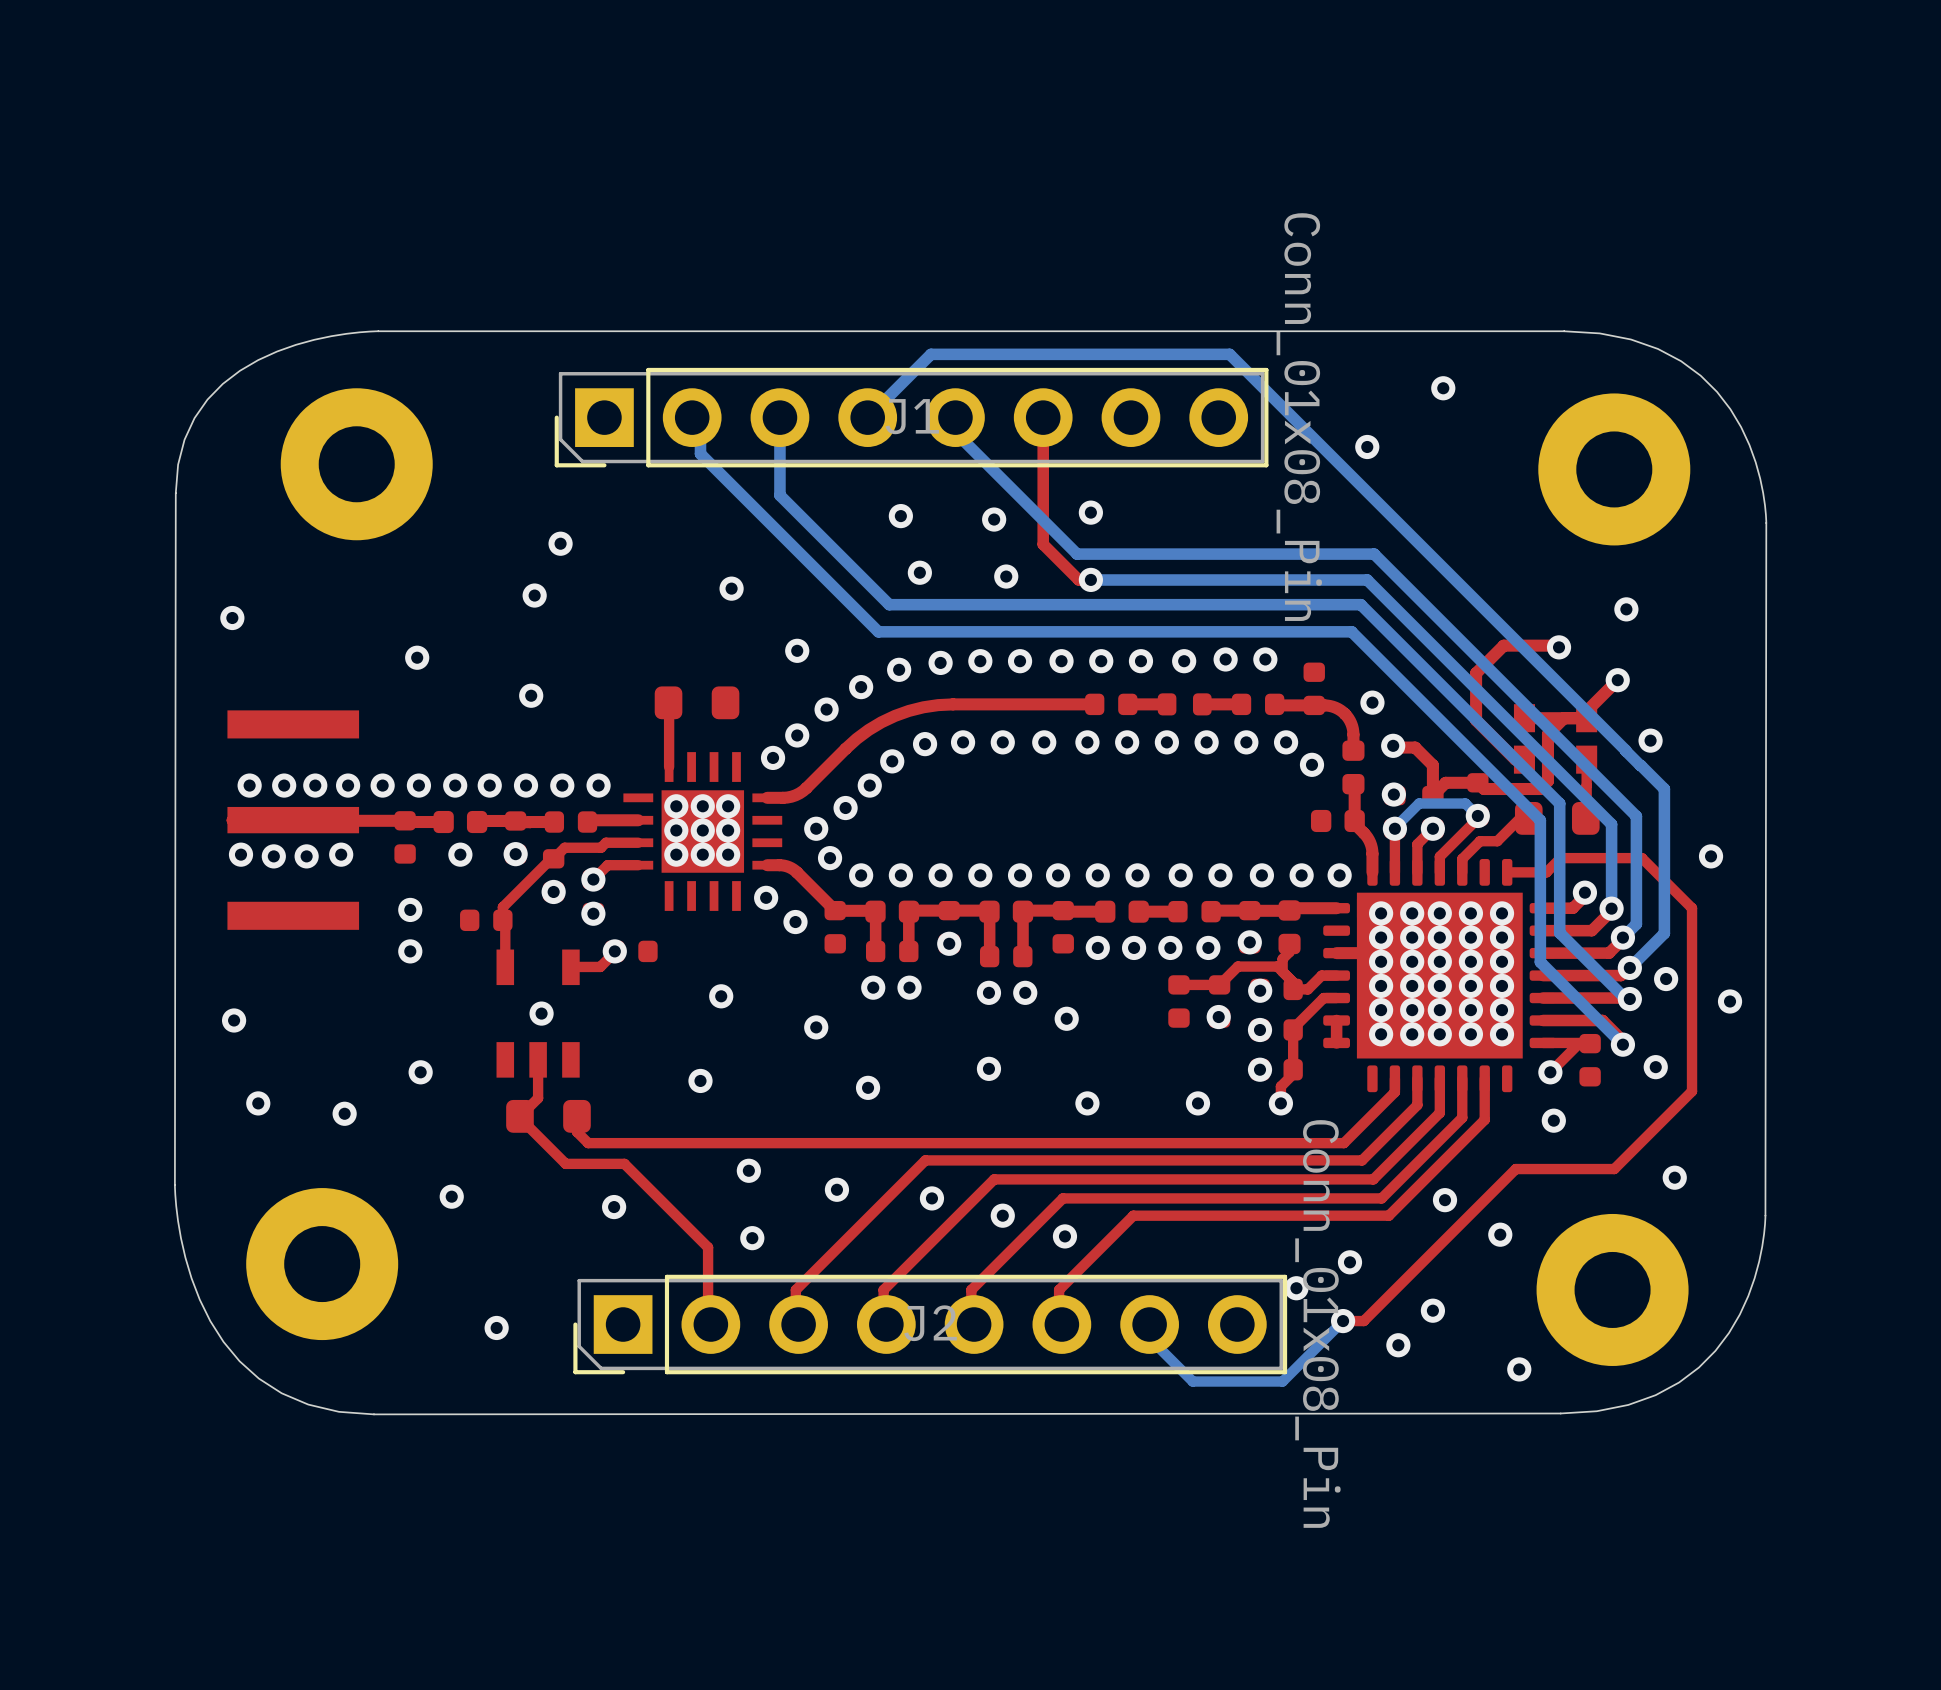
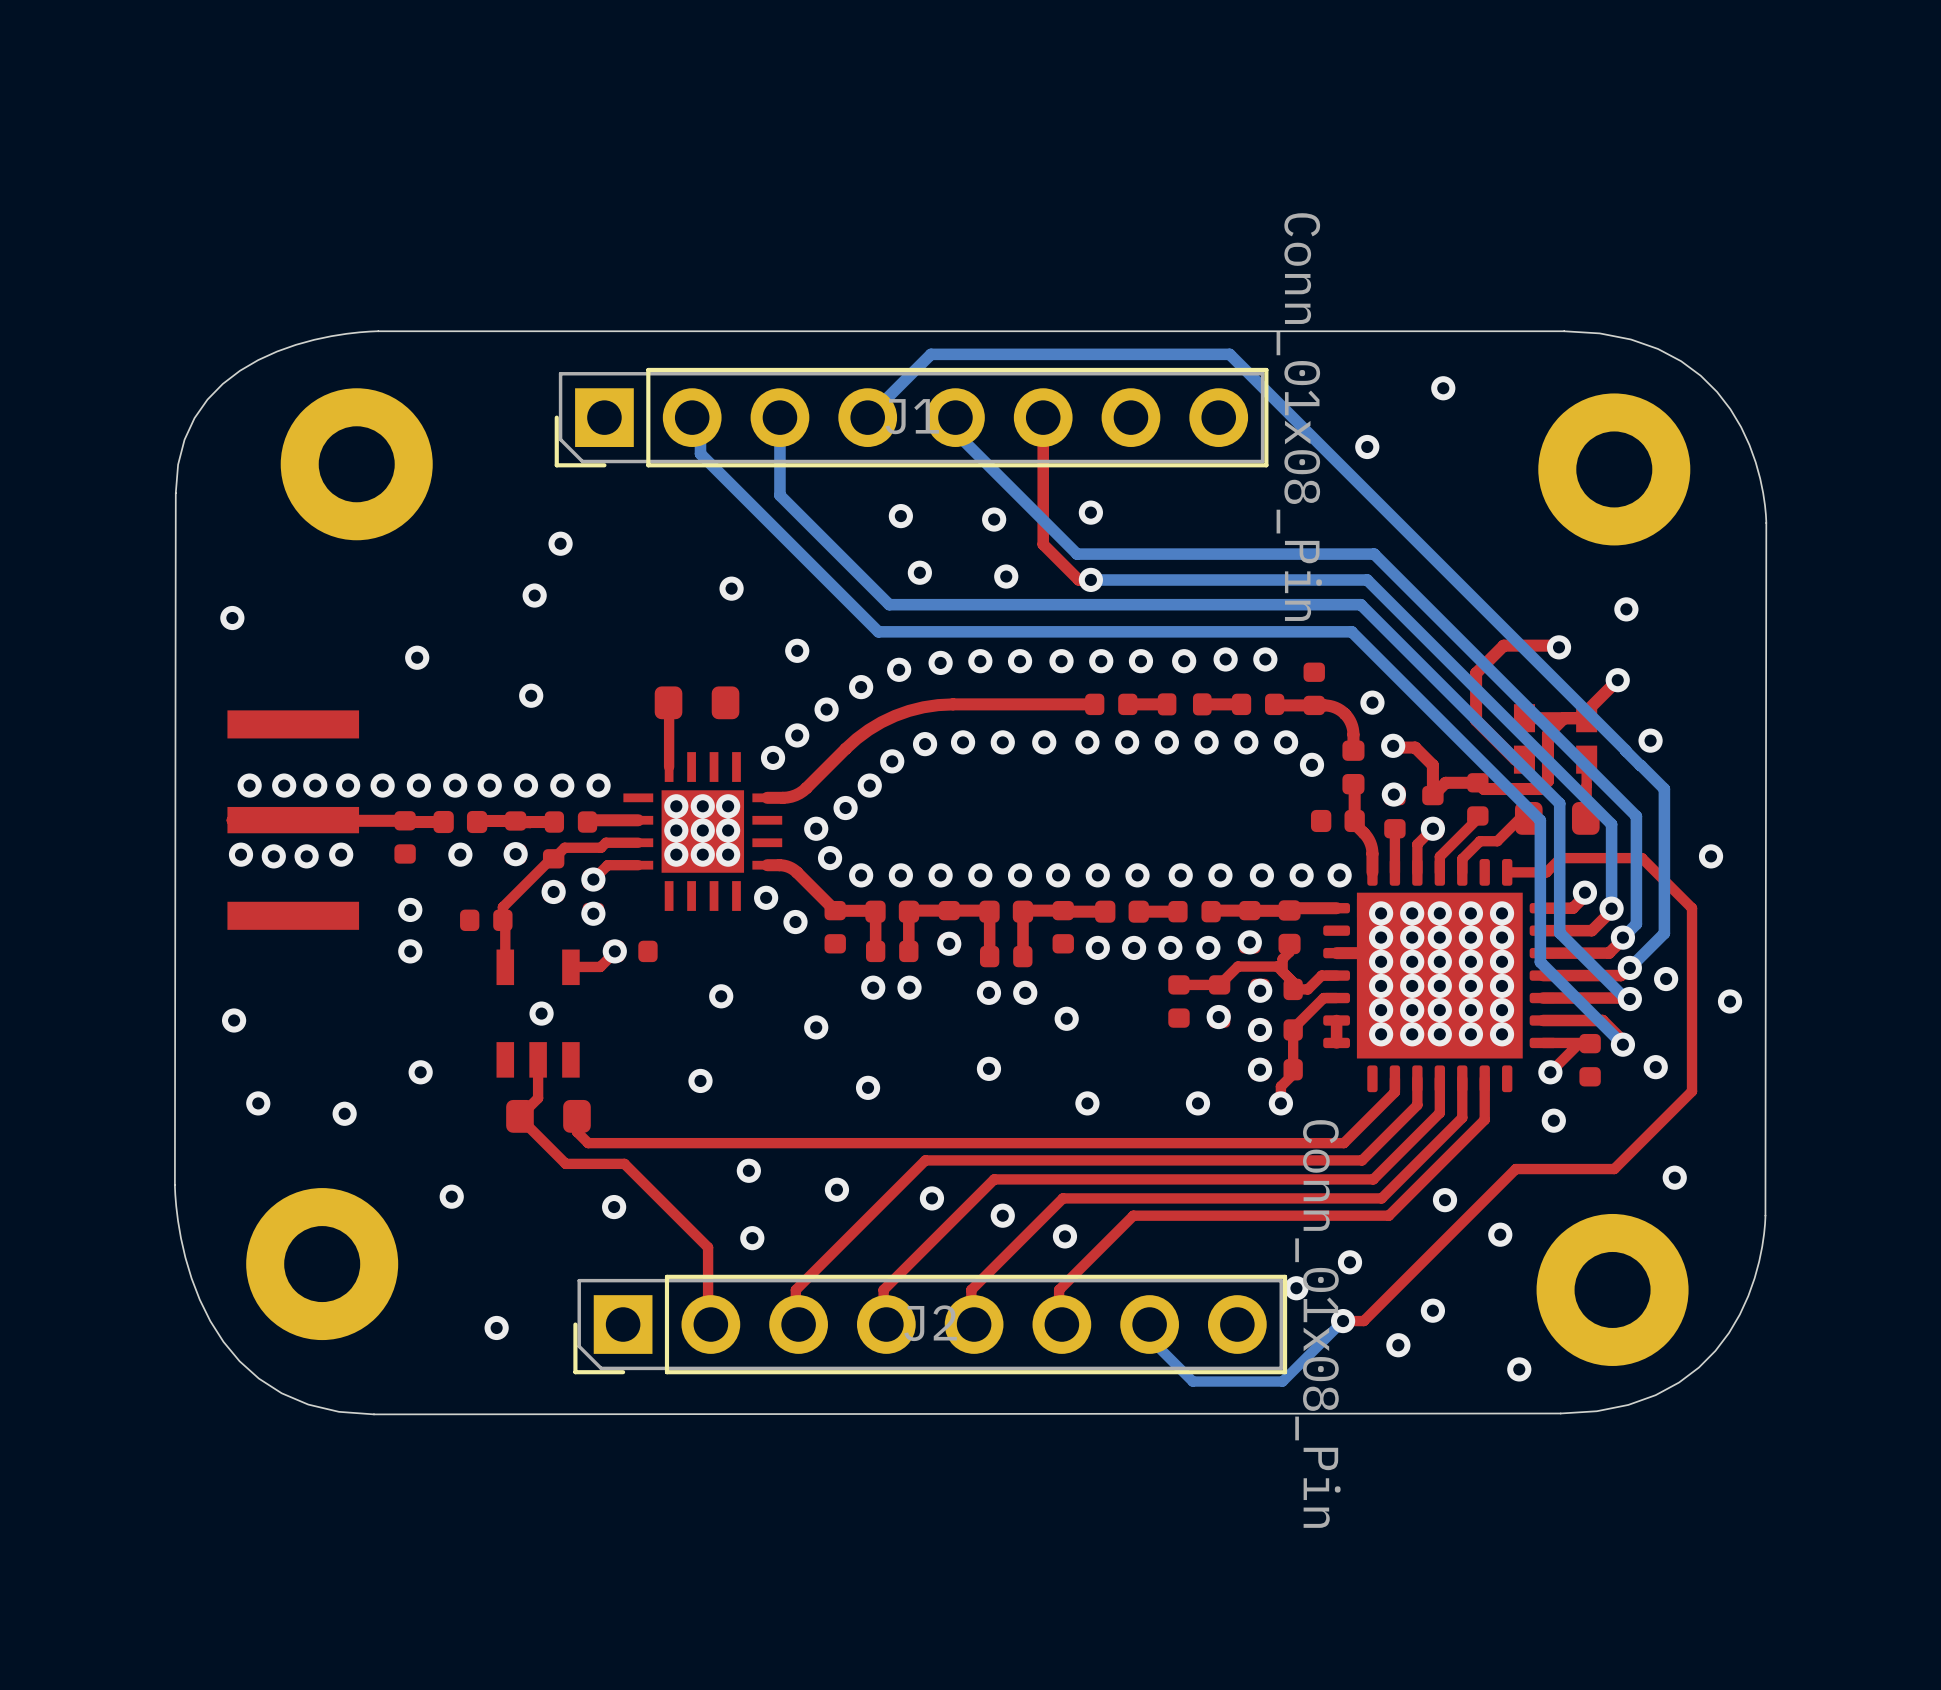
bottom track: (1477, 815) (1465, 803) (1419, 803) (1394, 828) -> none
via: (1477, 815) -> none
via: (1394, 828) -> none

